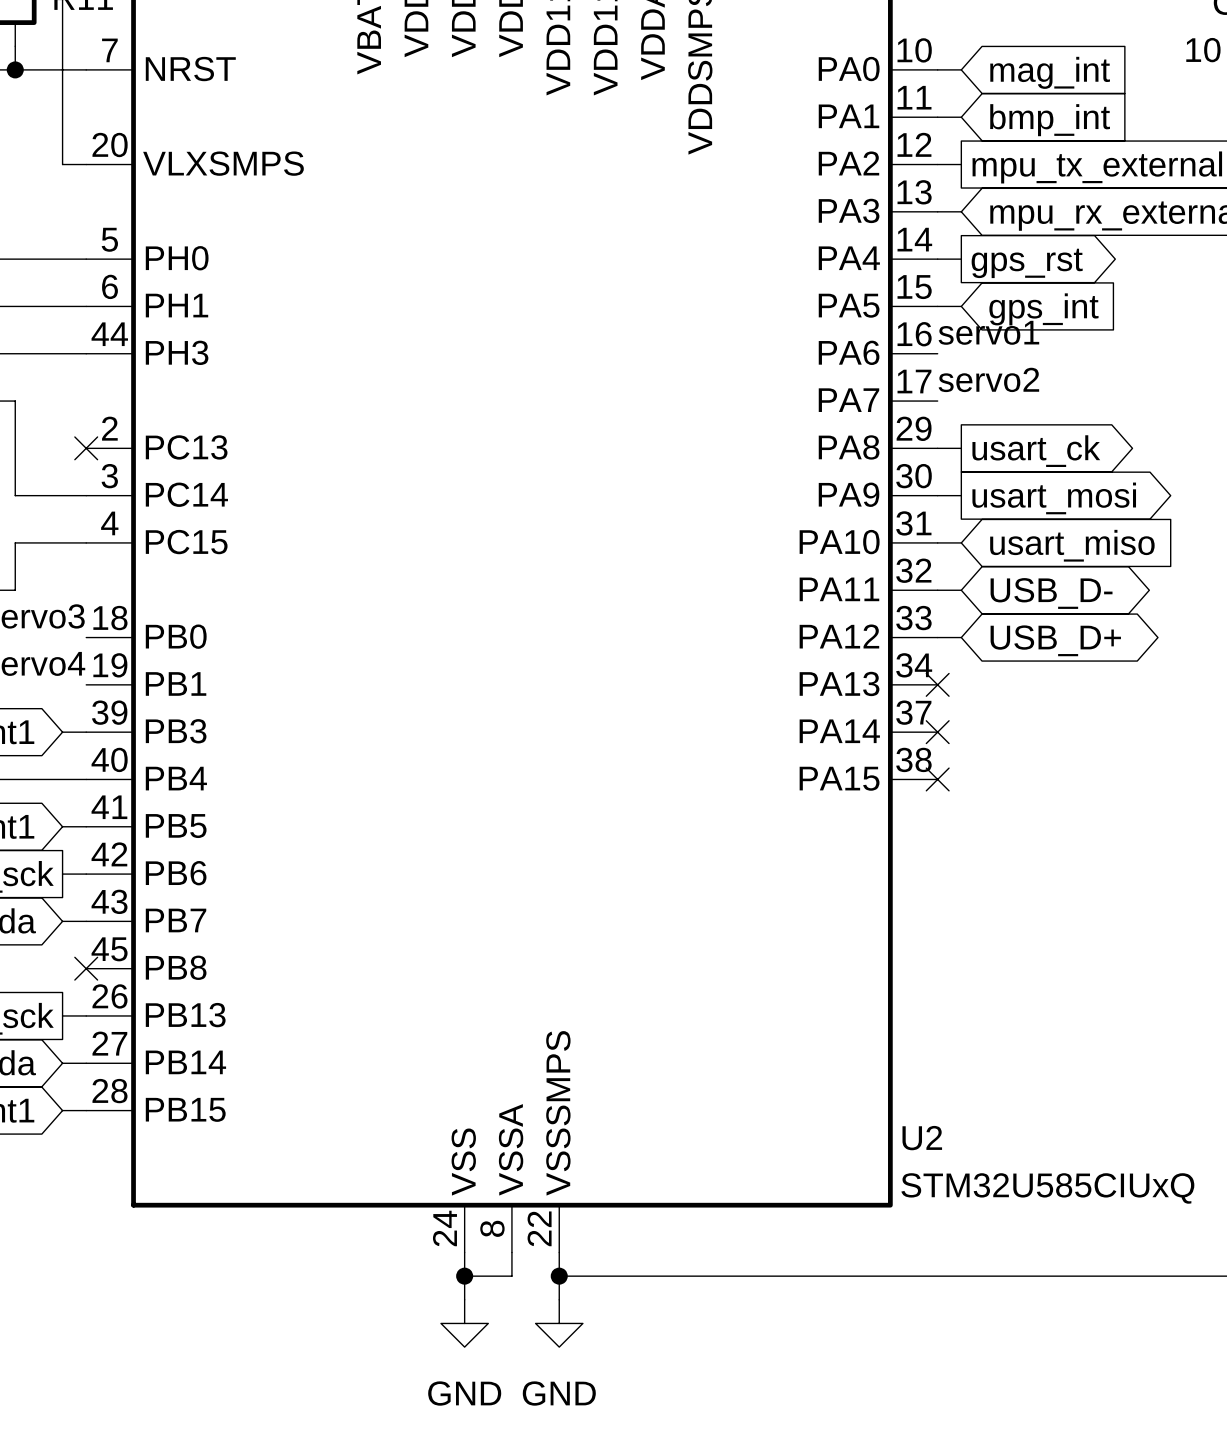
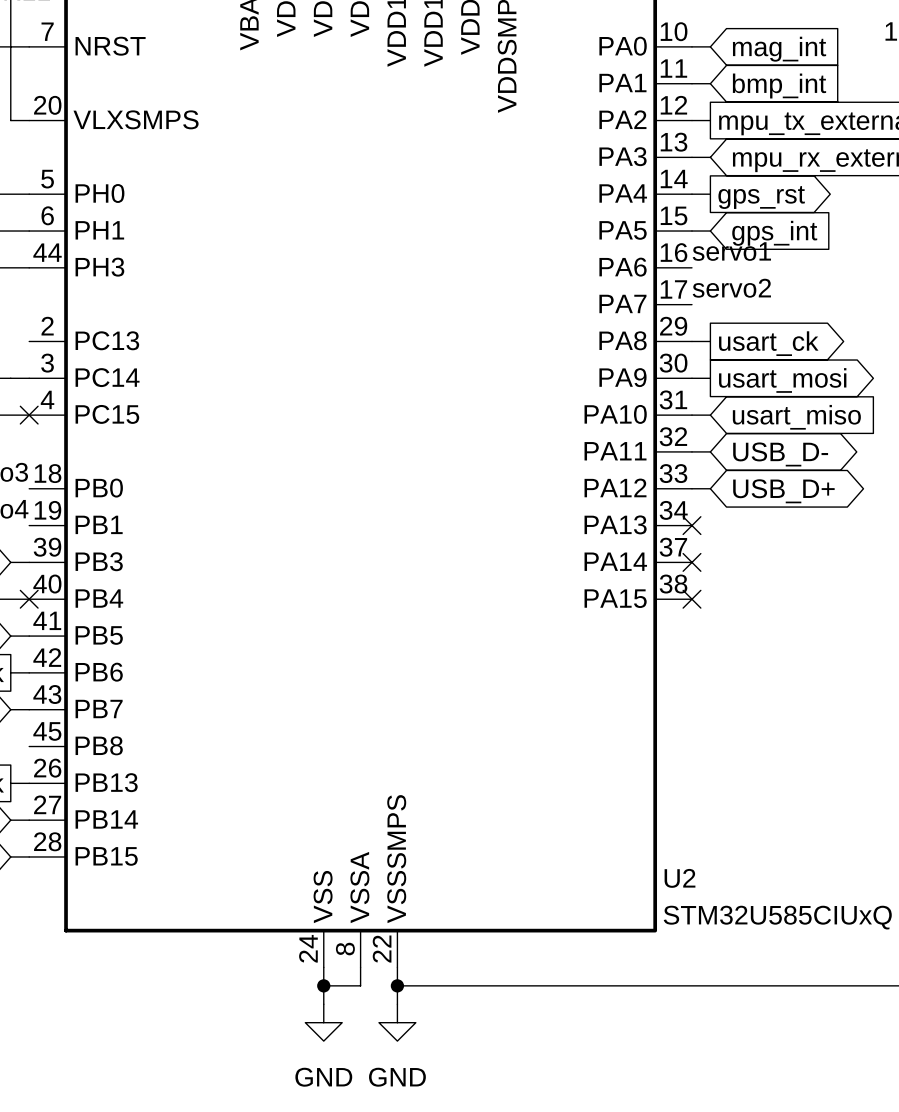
no-connect mark position: (86, 448) -> (29, 415)
no-connect mark: none -> (29, 599)
no-connect mark: (86, 968) -> none

